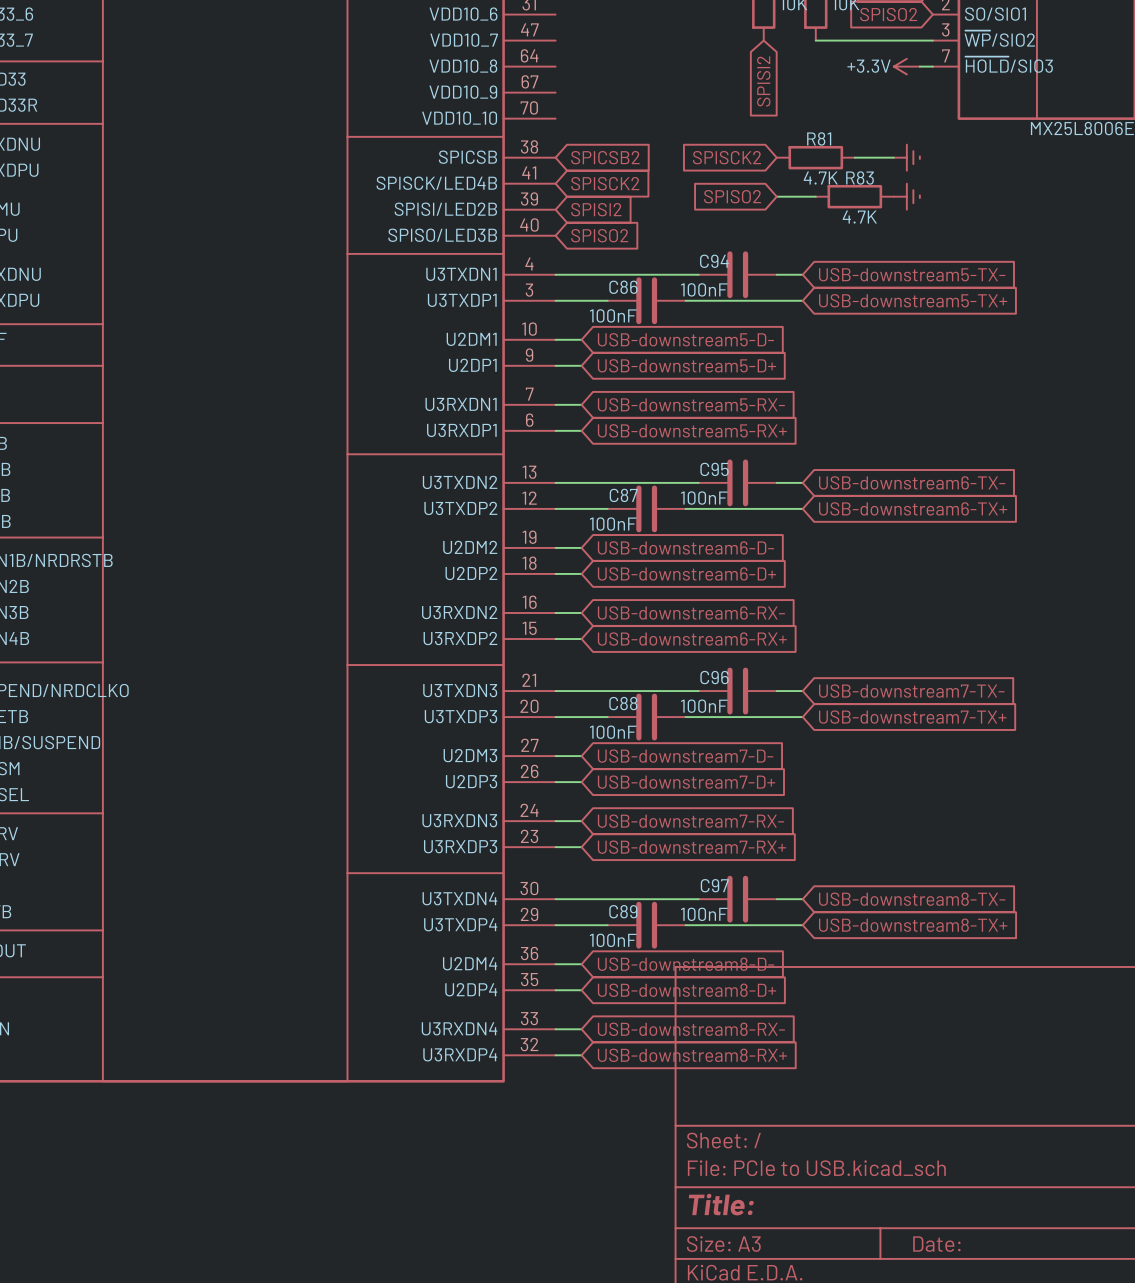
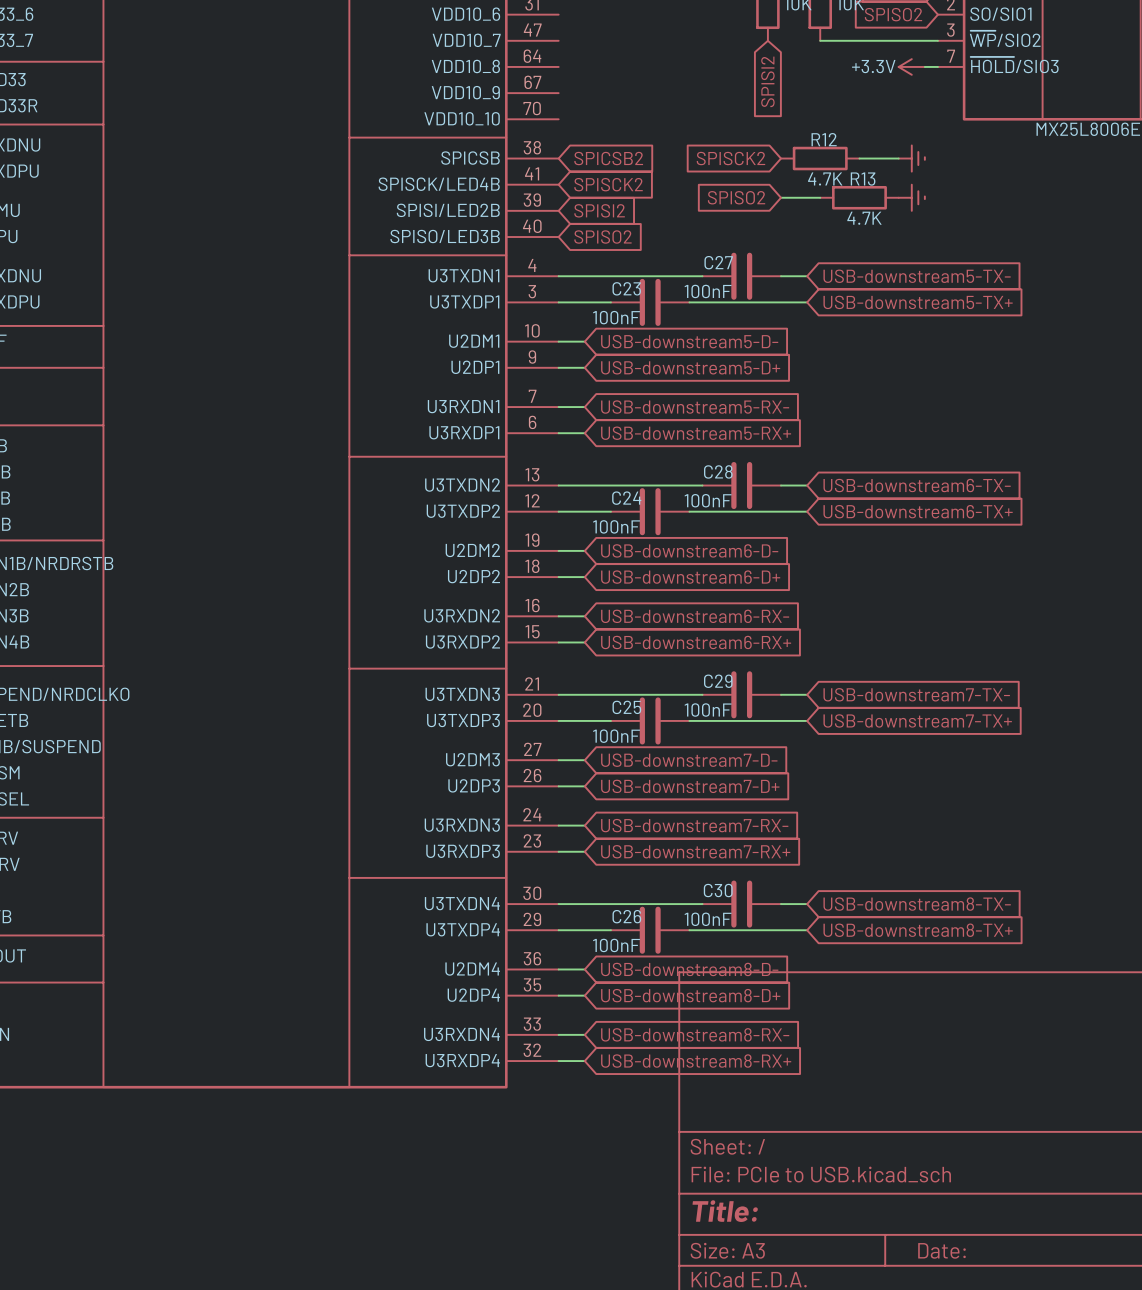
R81 name: R81 (819, 138) -> R12 (824, 139)
R83 name: R83 (860, 177) -> R13 (863, 179)
C94 name: C94 (714, 261) -> C27 (718, 262)
C86 name: C86 (623, 287) -> C23 (626, 288)
C95 name: C95 (714, 469) -> C28 (718, 471)
C87 name: C87 (623, 495) -> C24 (626, 498)
C96 name: C96 (714, 677) -> C29 (718, 681)
C88 name: C88 (623, 703) -> C25 (626, 707)
C97 name: C97 (714, 885) -> C30 (718, 890)
C89 name: C89 (623, 911) -> C26 (626, 916)

